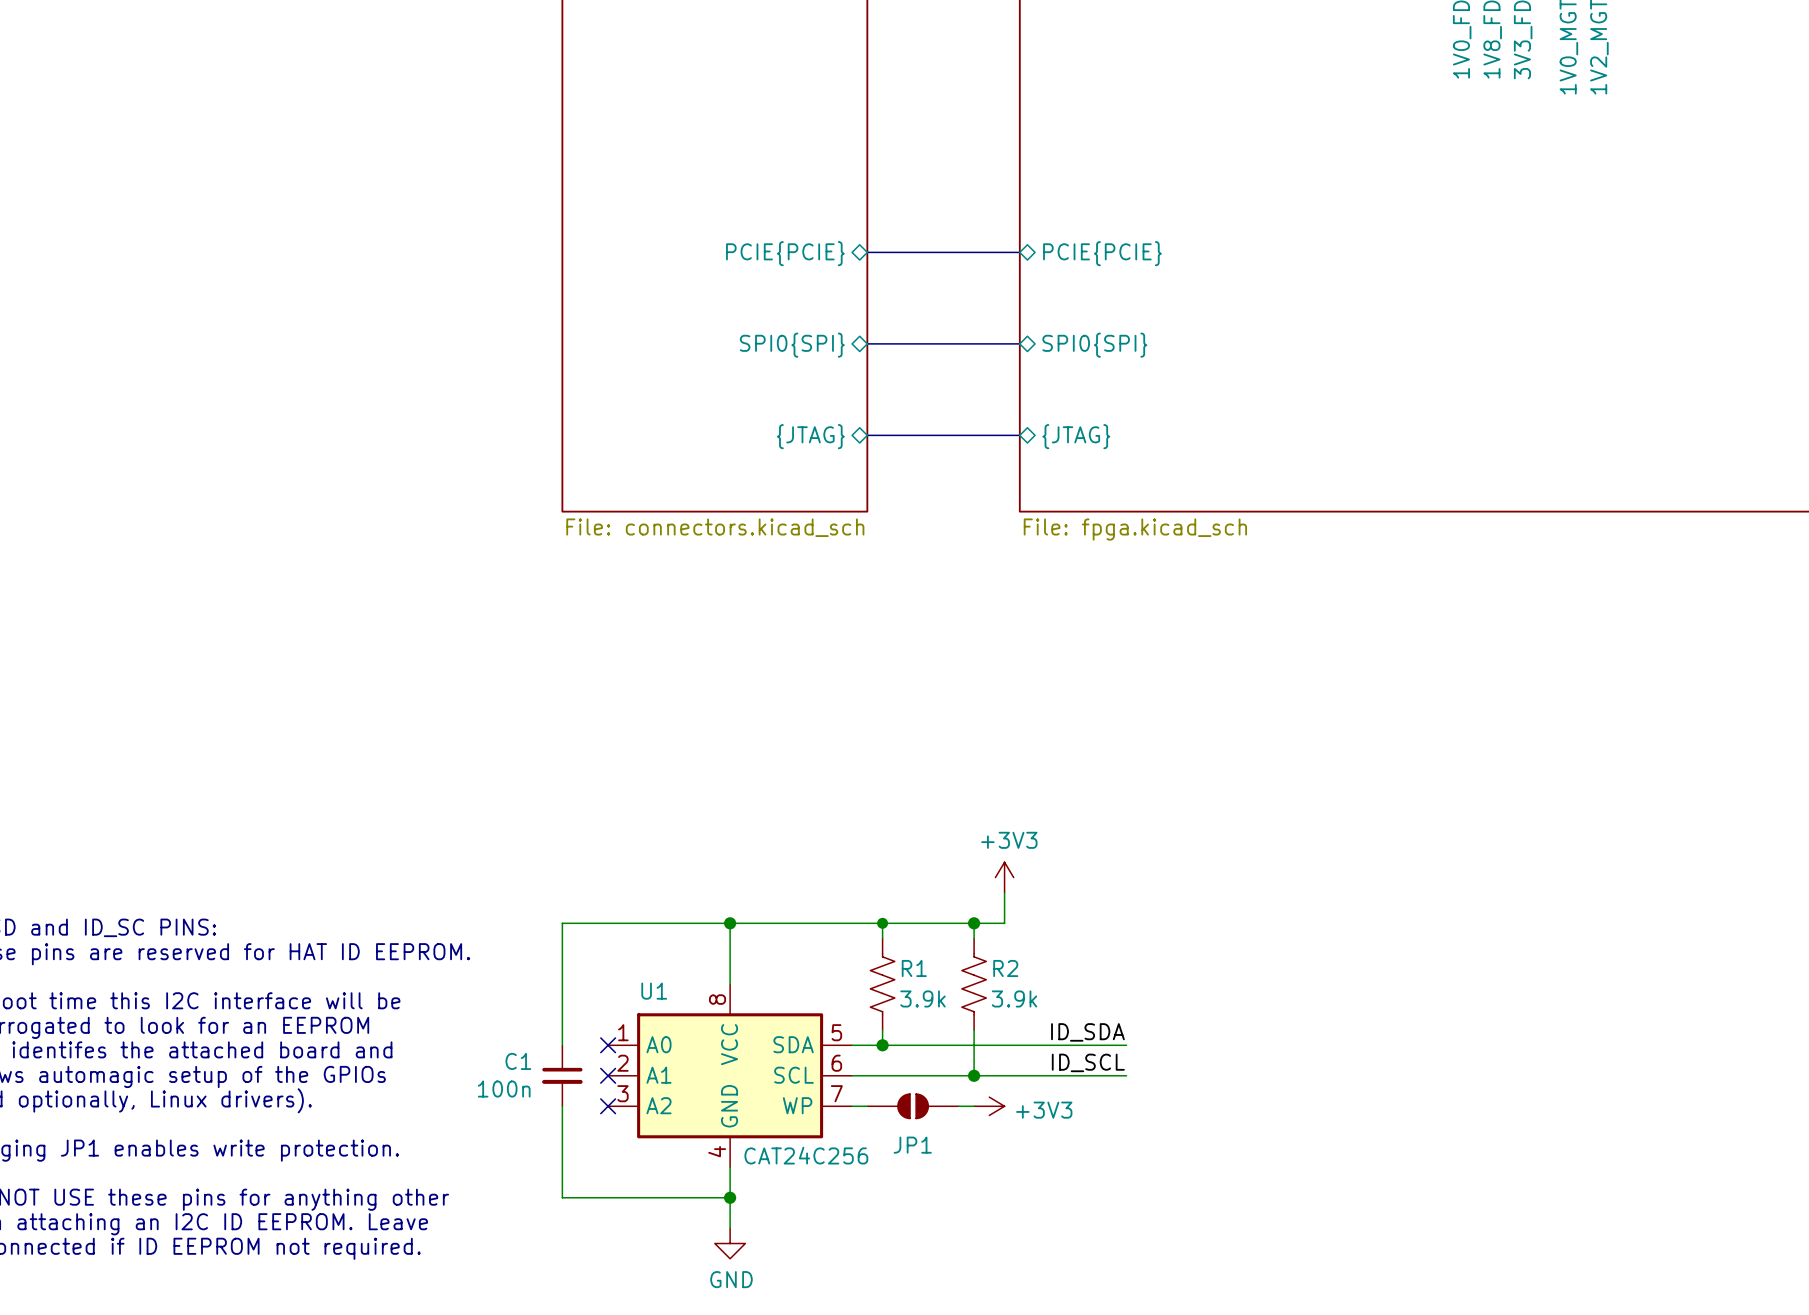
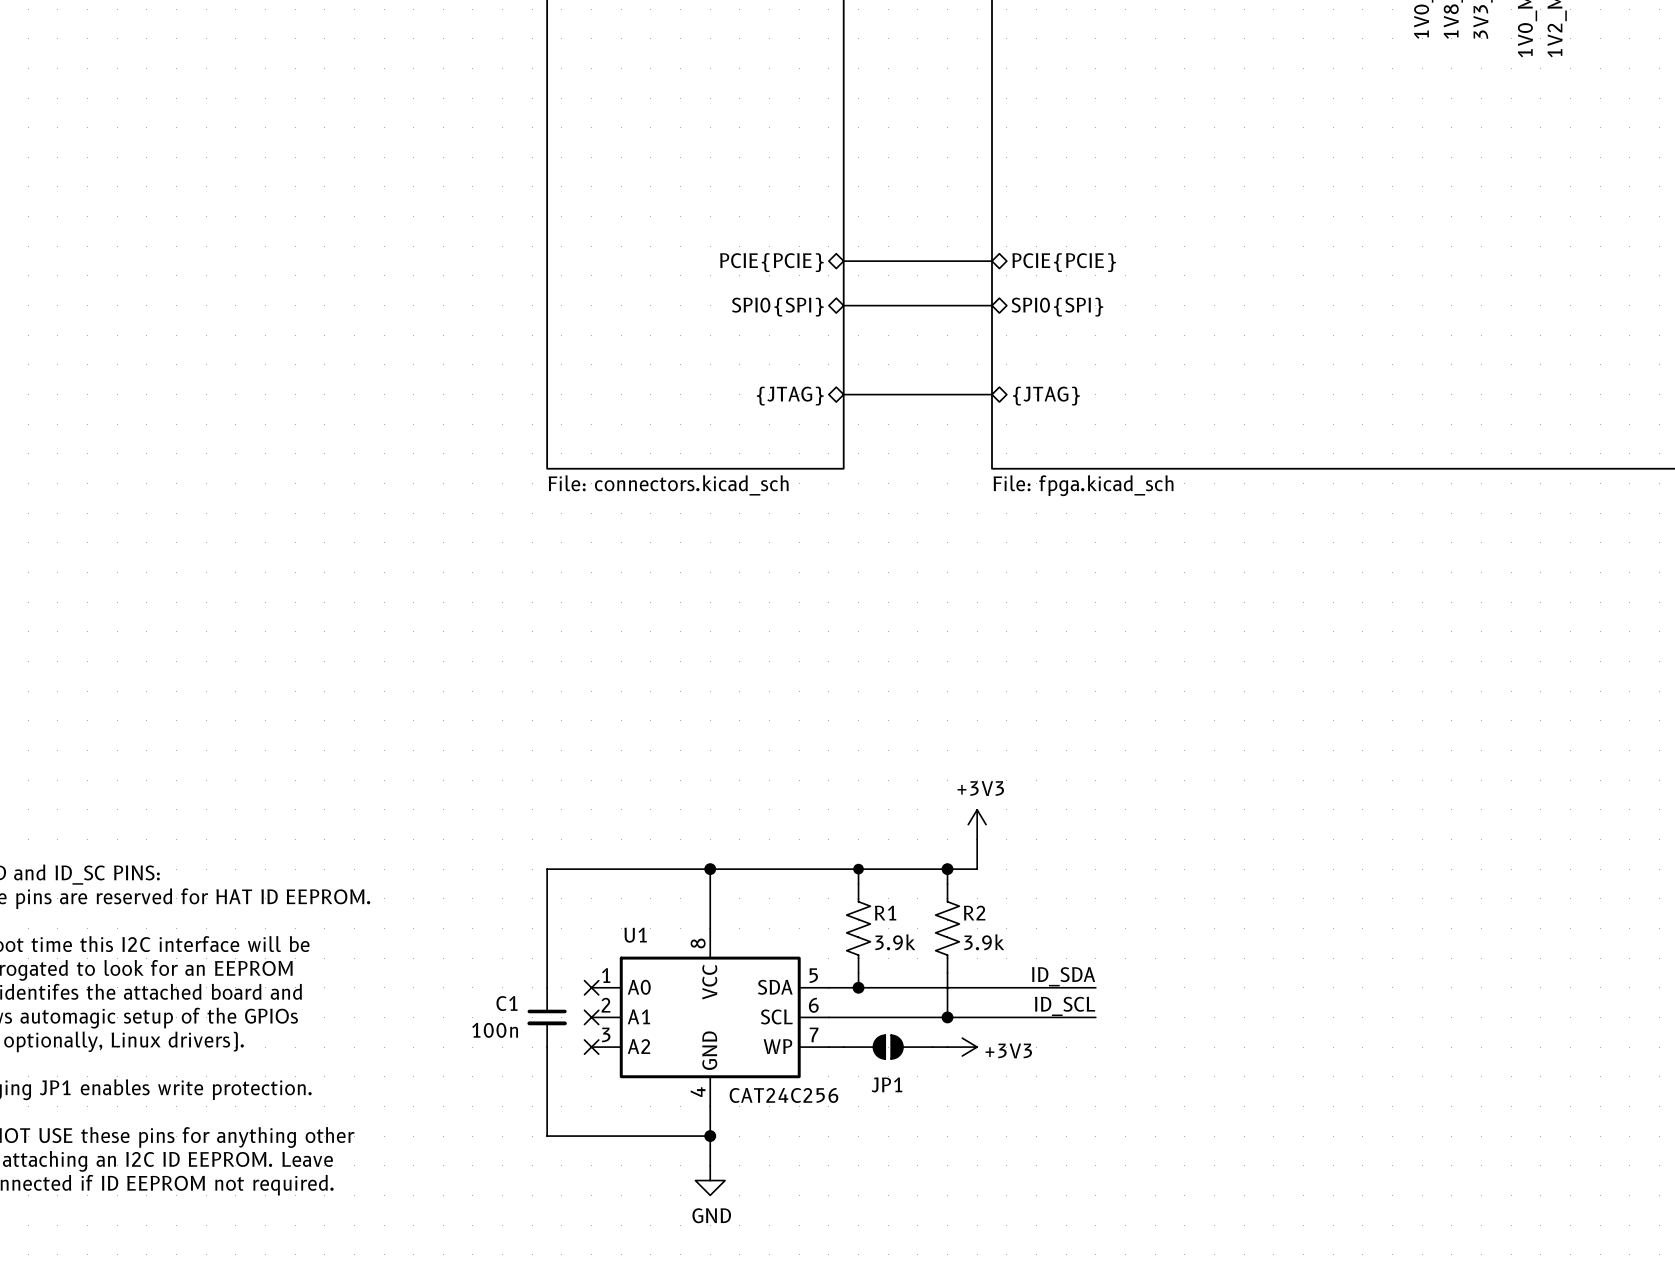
bus: (867, 252) (1019, 252) -> (843, 261) (992, 261)
sheet pin position: PCIE{PCIE} (785, 253) -> PCIE{PCIE} (771, 262)
sheet pin position: PCIE{PCIE} (1102, 253) -> PCIE{PCIE} (1064, 262)

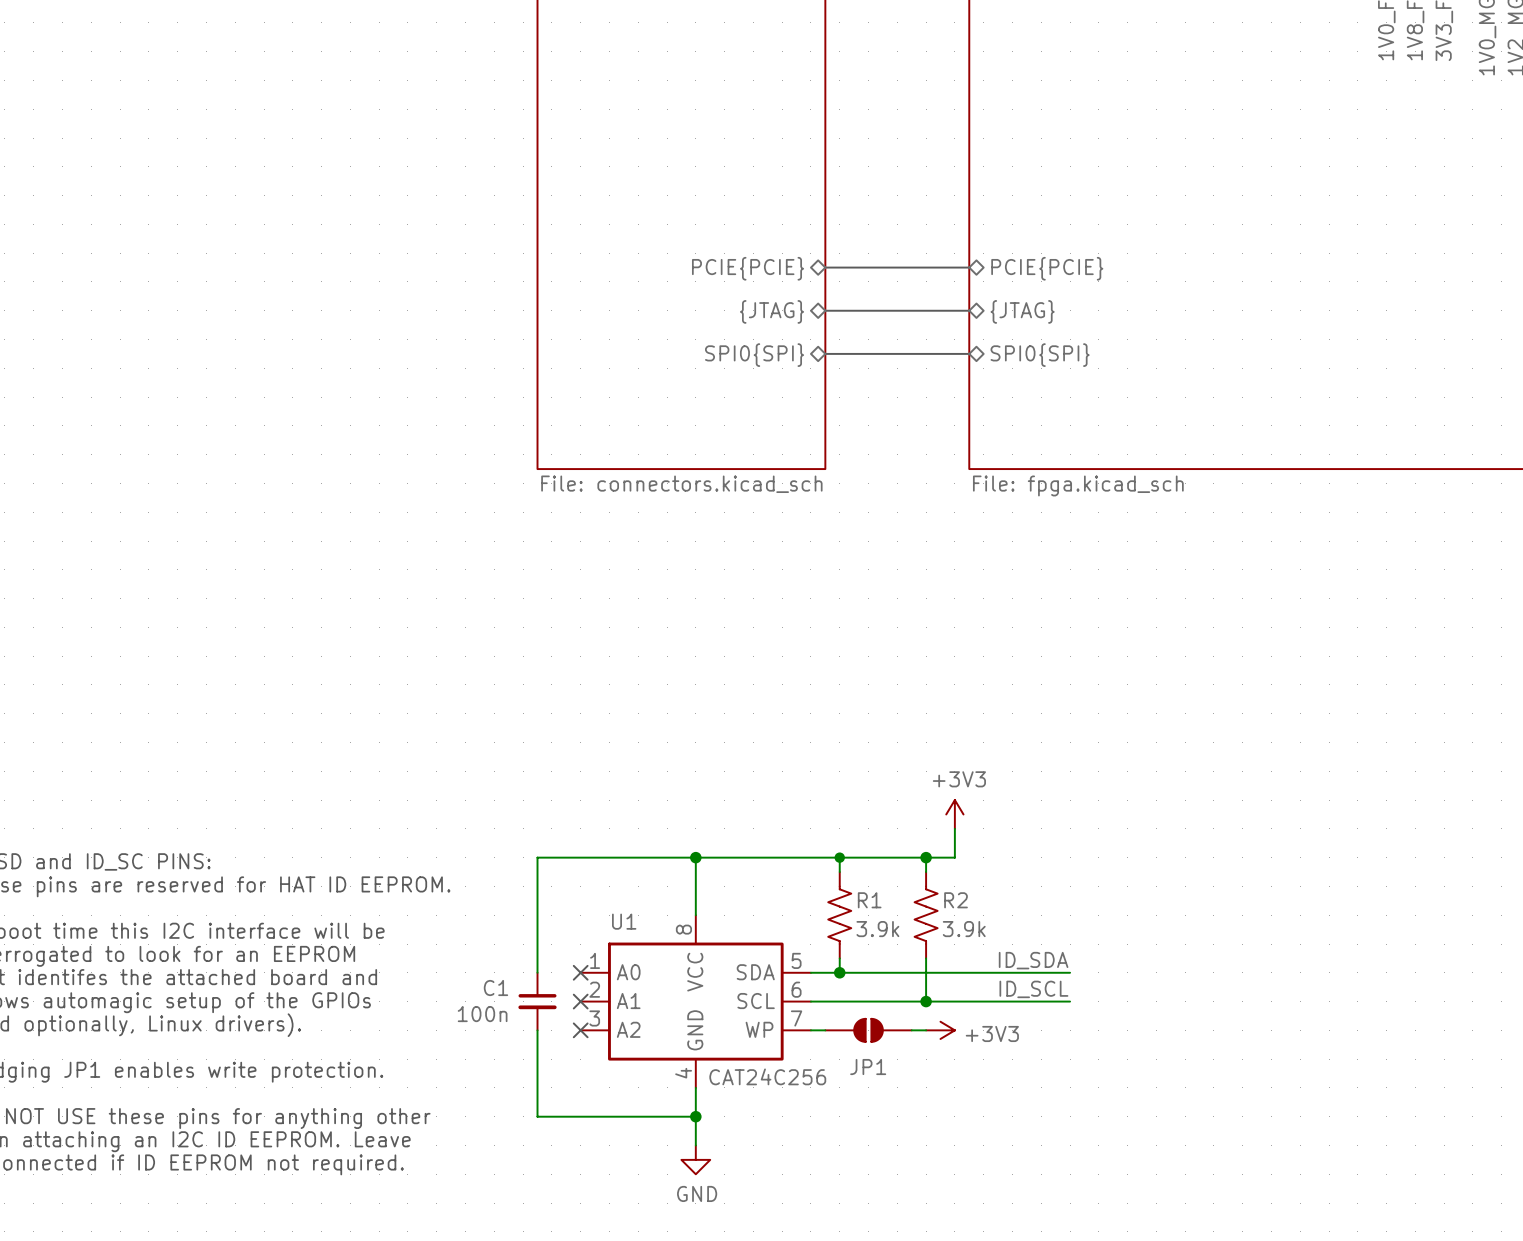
sheet pin: SPI0{SPI} (777, 307) -> {JTAG} (772, 311)
sheet pin: SPI0{SPI} (1057, 307) -> {JTAG} (1022, 311)
sheet pin: none -> SPI0{SPI} (754, 355)
sheet pin: none -> SPI0{SPI} (1040, 355)
bus: (843, 394) (992, 394) -> (825, 353) (969, 353)
sheet pin: {JTAG} (790, 396) -> none
sheet pin: {JTAG} (1046, 396) -> none

